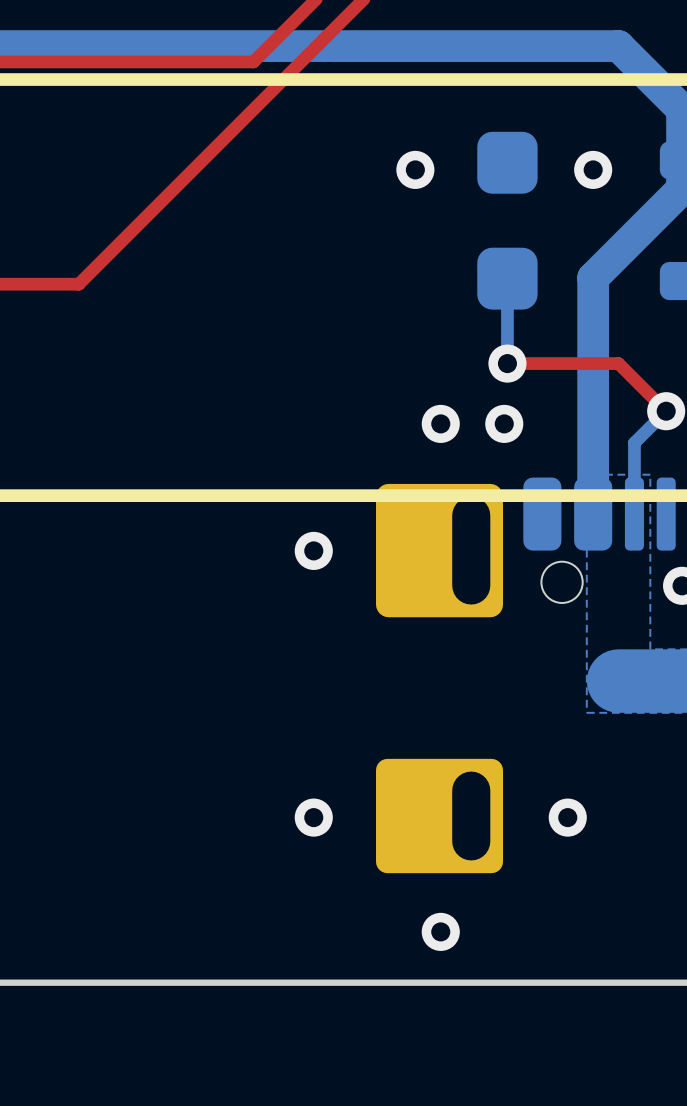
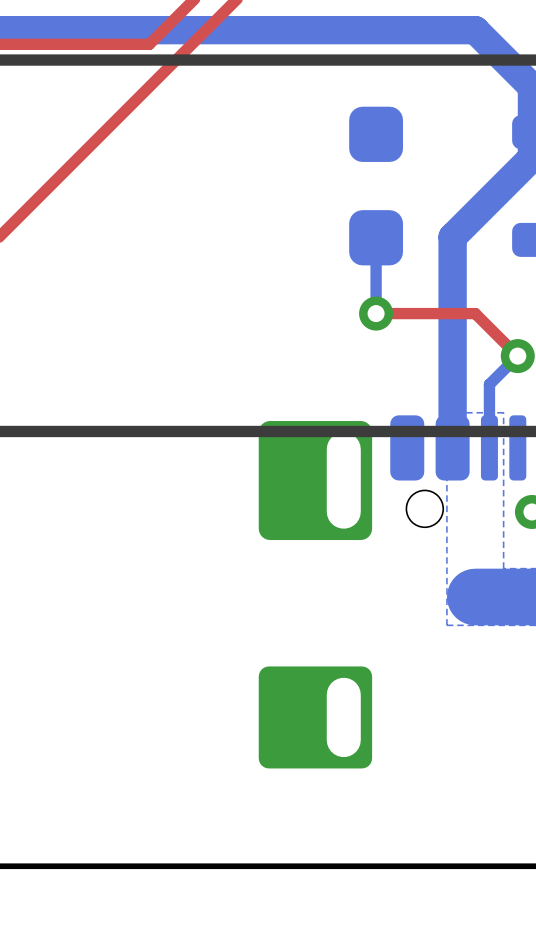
via: (415, 169) -> none
via: (593, 169) -> none
via: (440, 423) -> none
via: (504, 423) -> none
via: (313, 550) -> none
via: (313, 817) -> none
via: (567, 817) -> none
via: (440, 931) -> none

